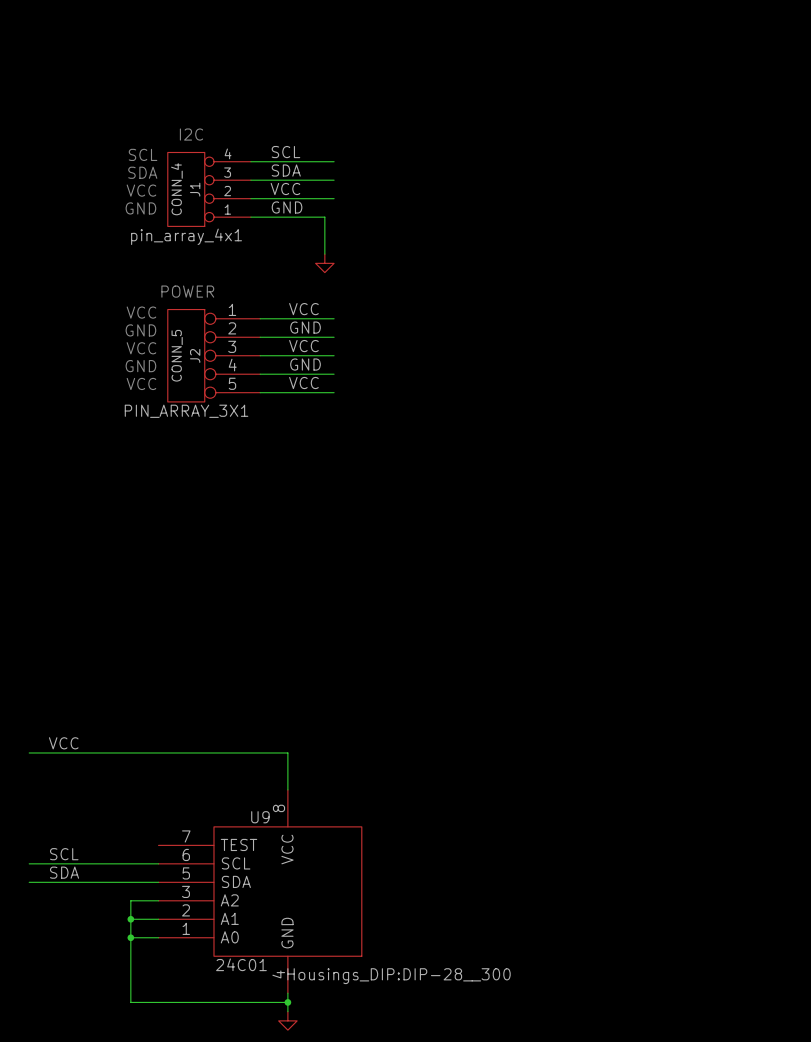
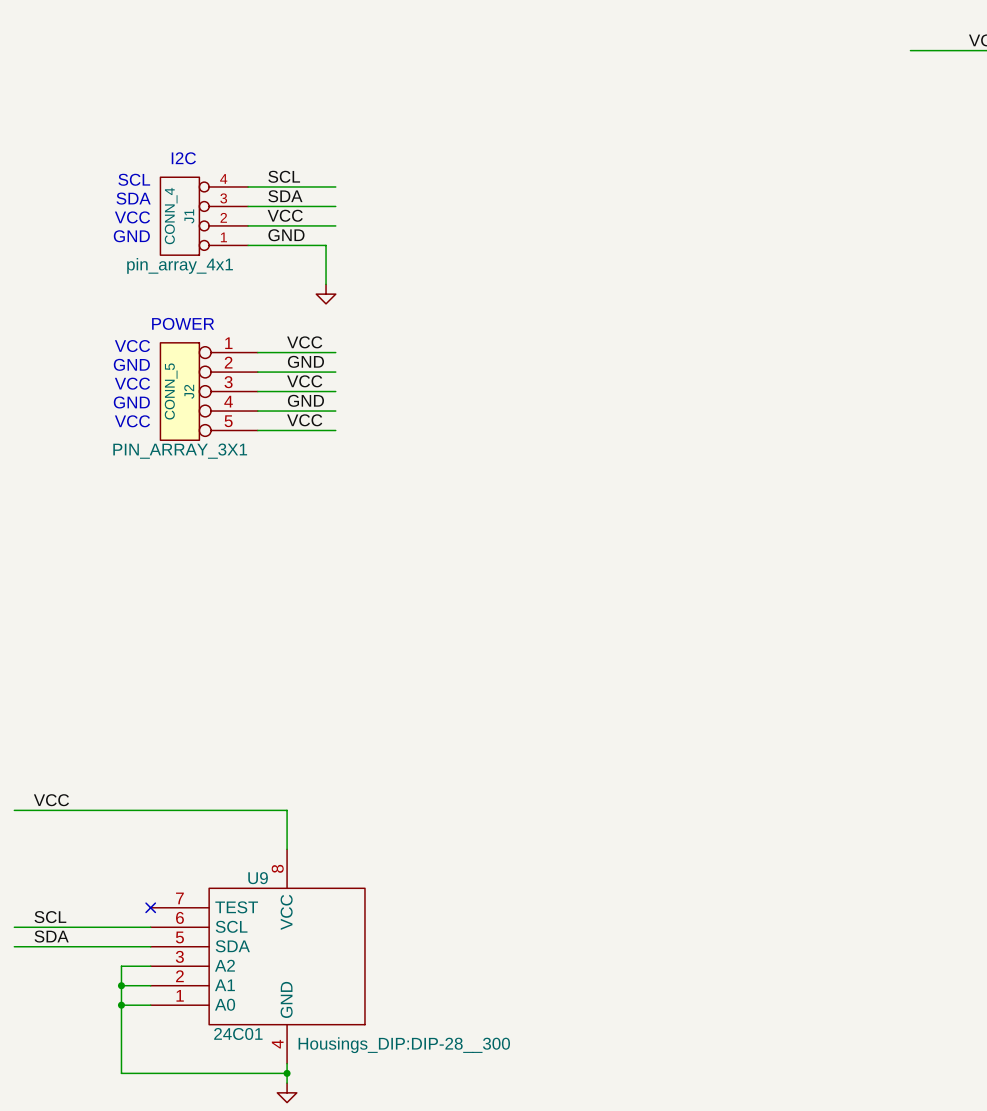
no-connect mark: none -> (150, 907)

